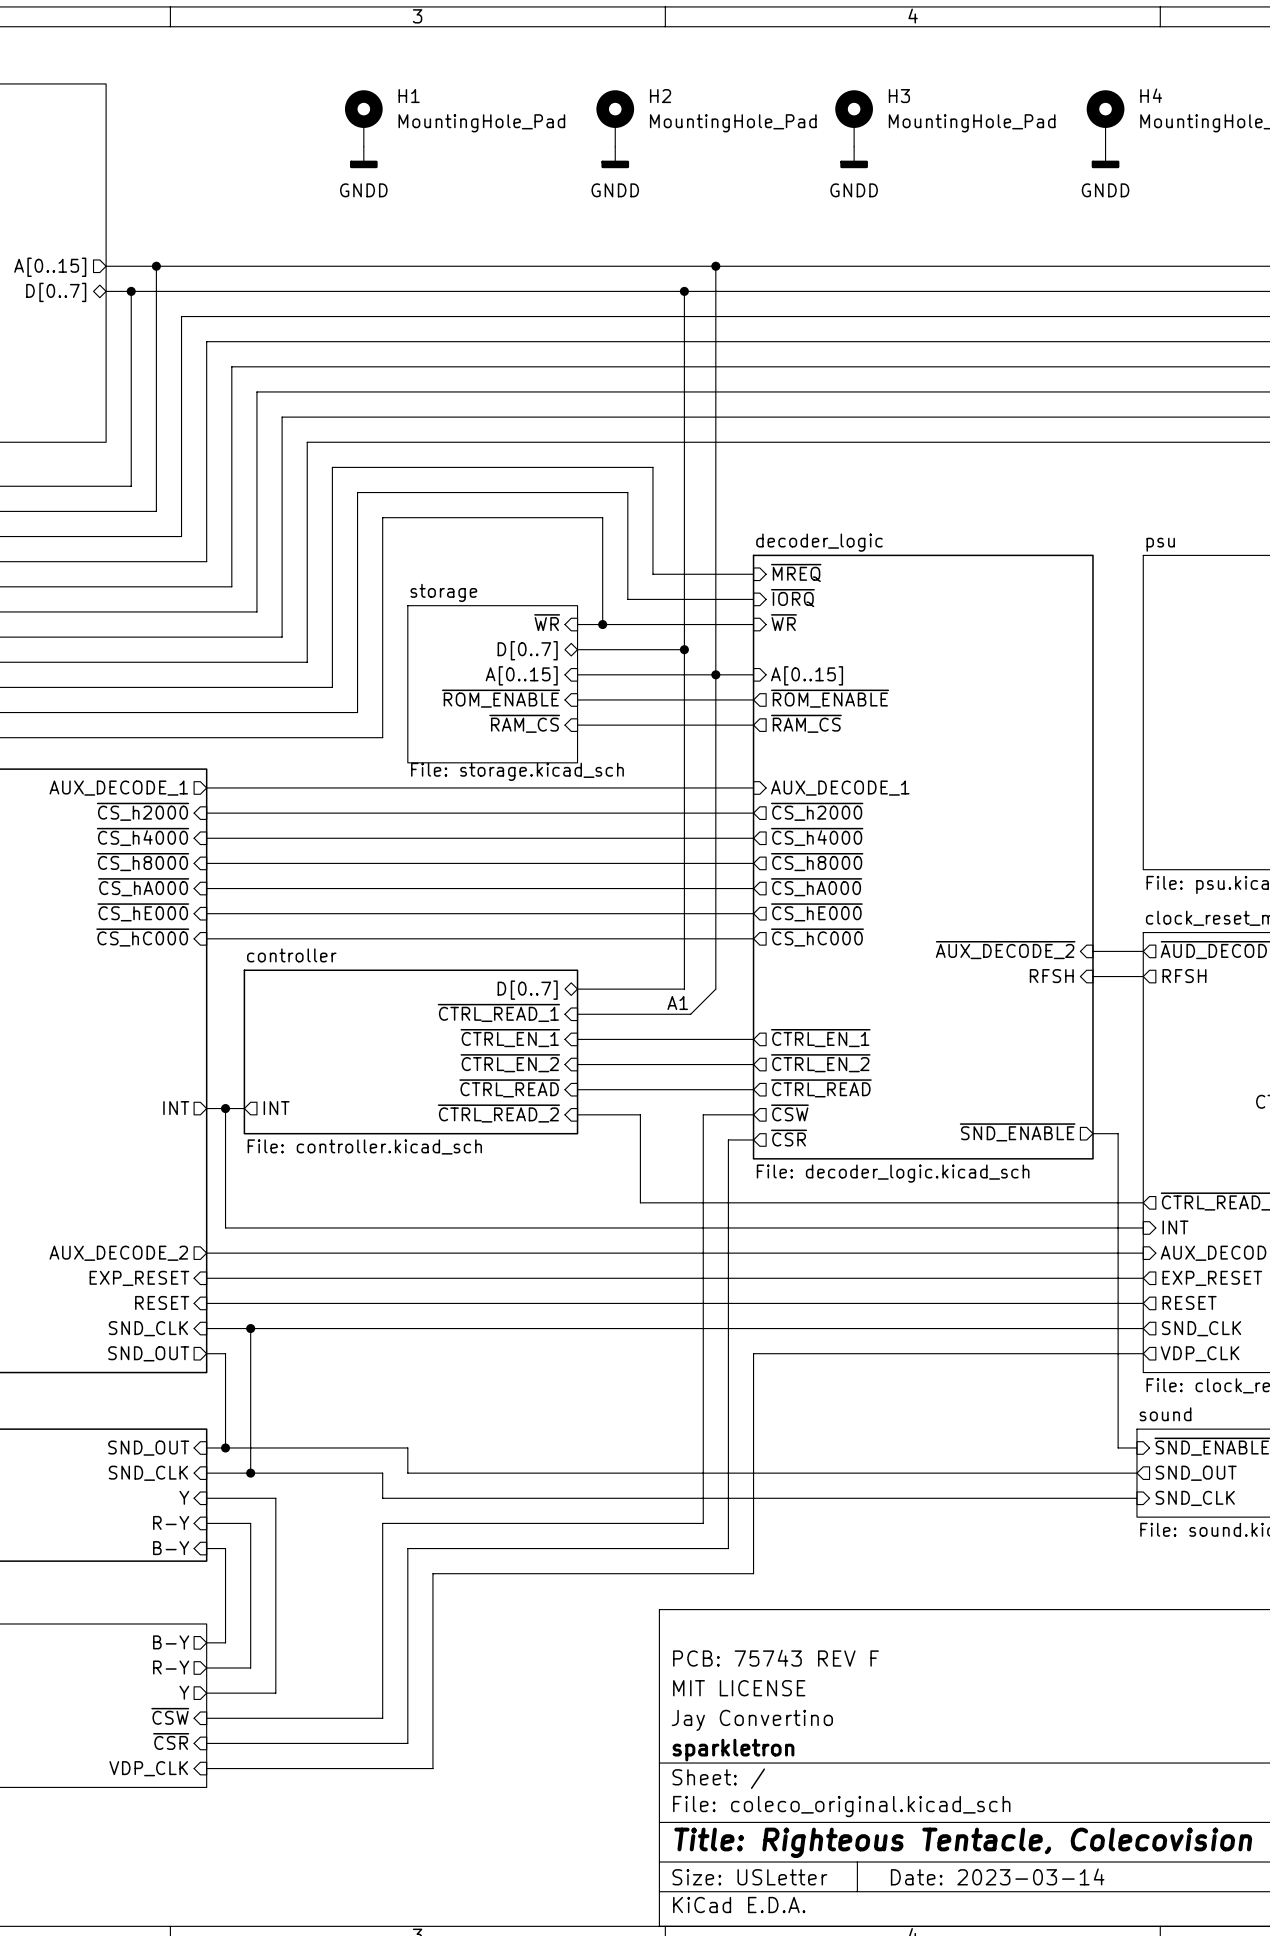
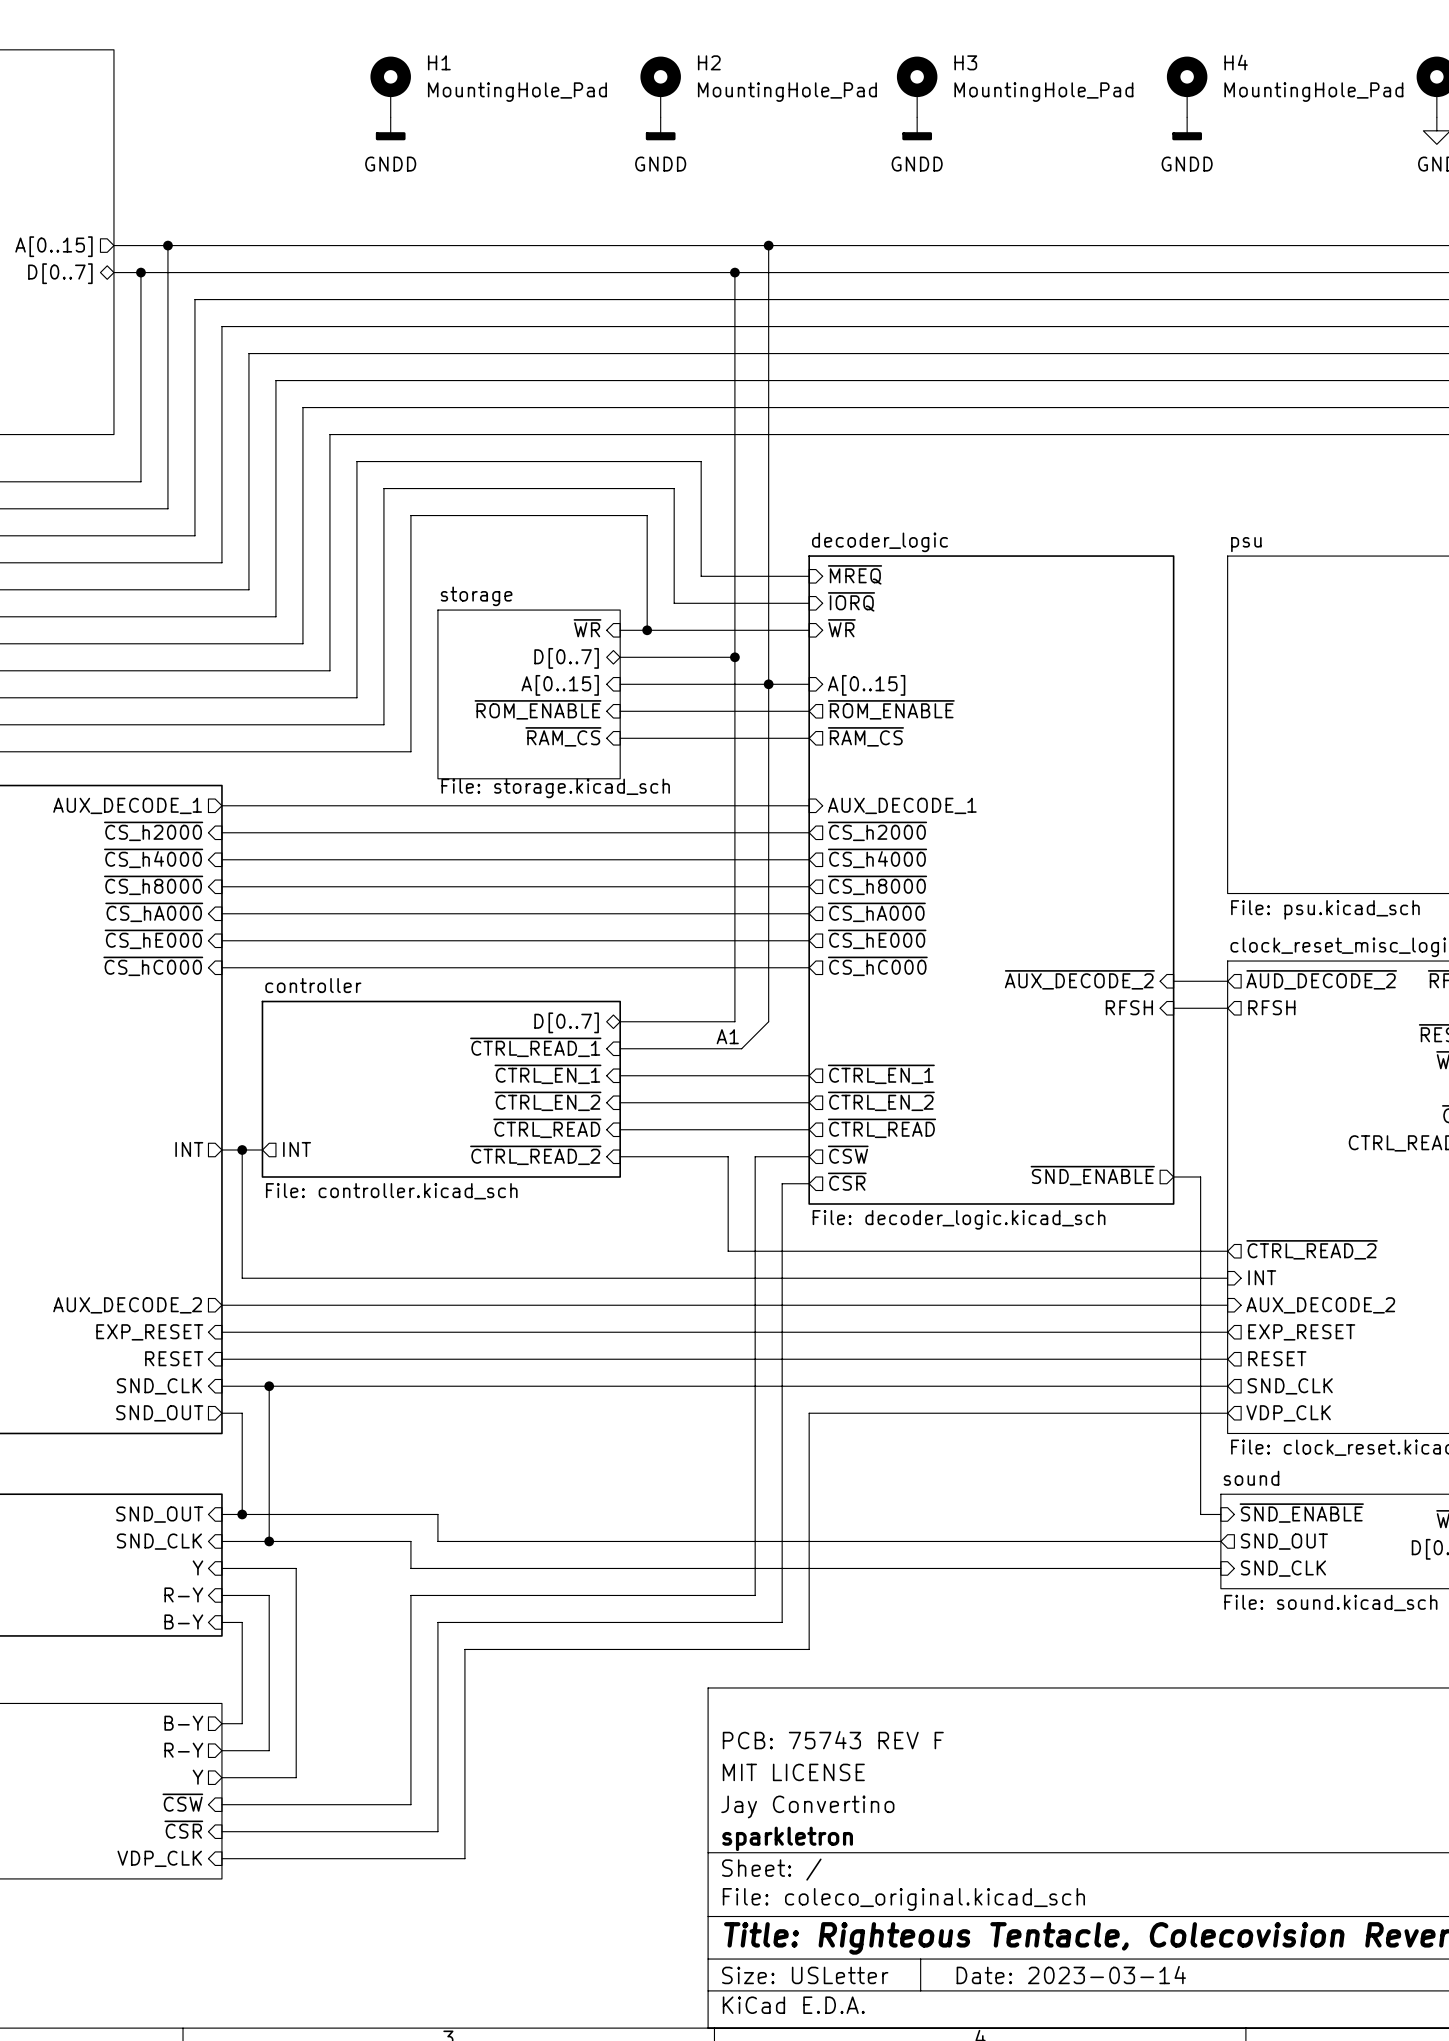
wire: (640, 1114) (640, 1202) (678, 1202) -> (687, 1156) (728, 1156) (728, 1251)

